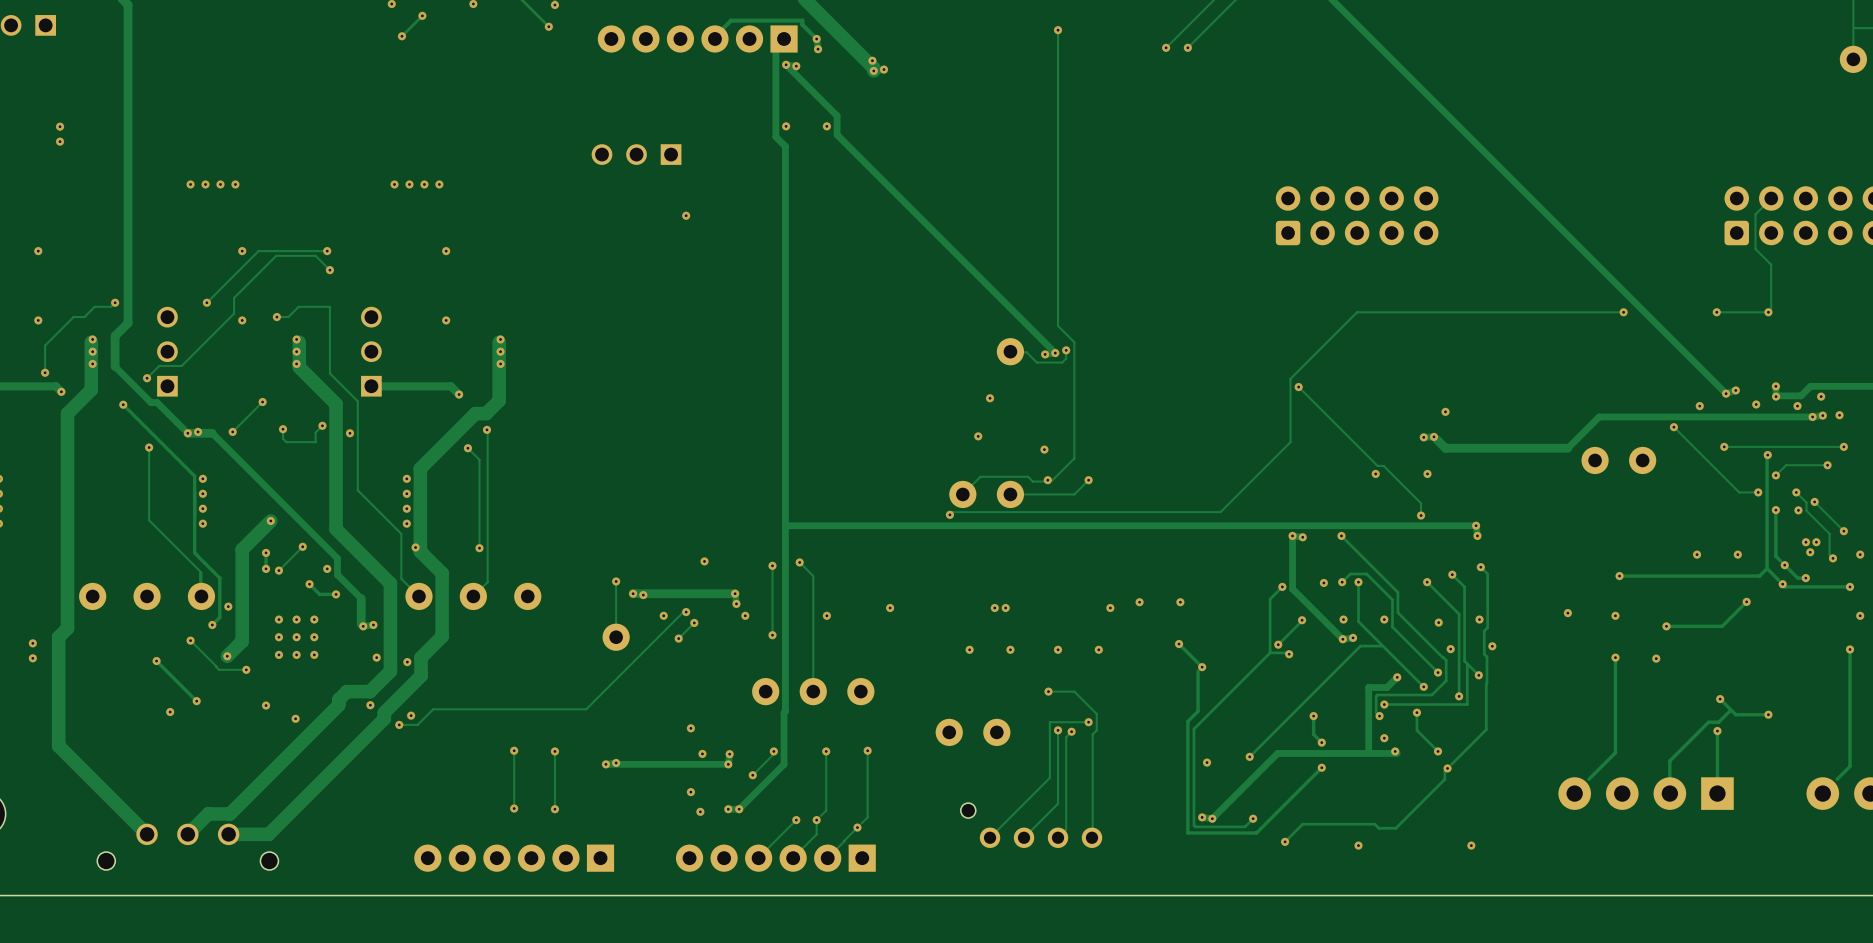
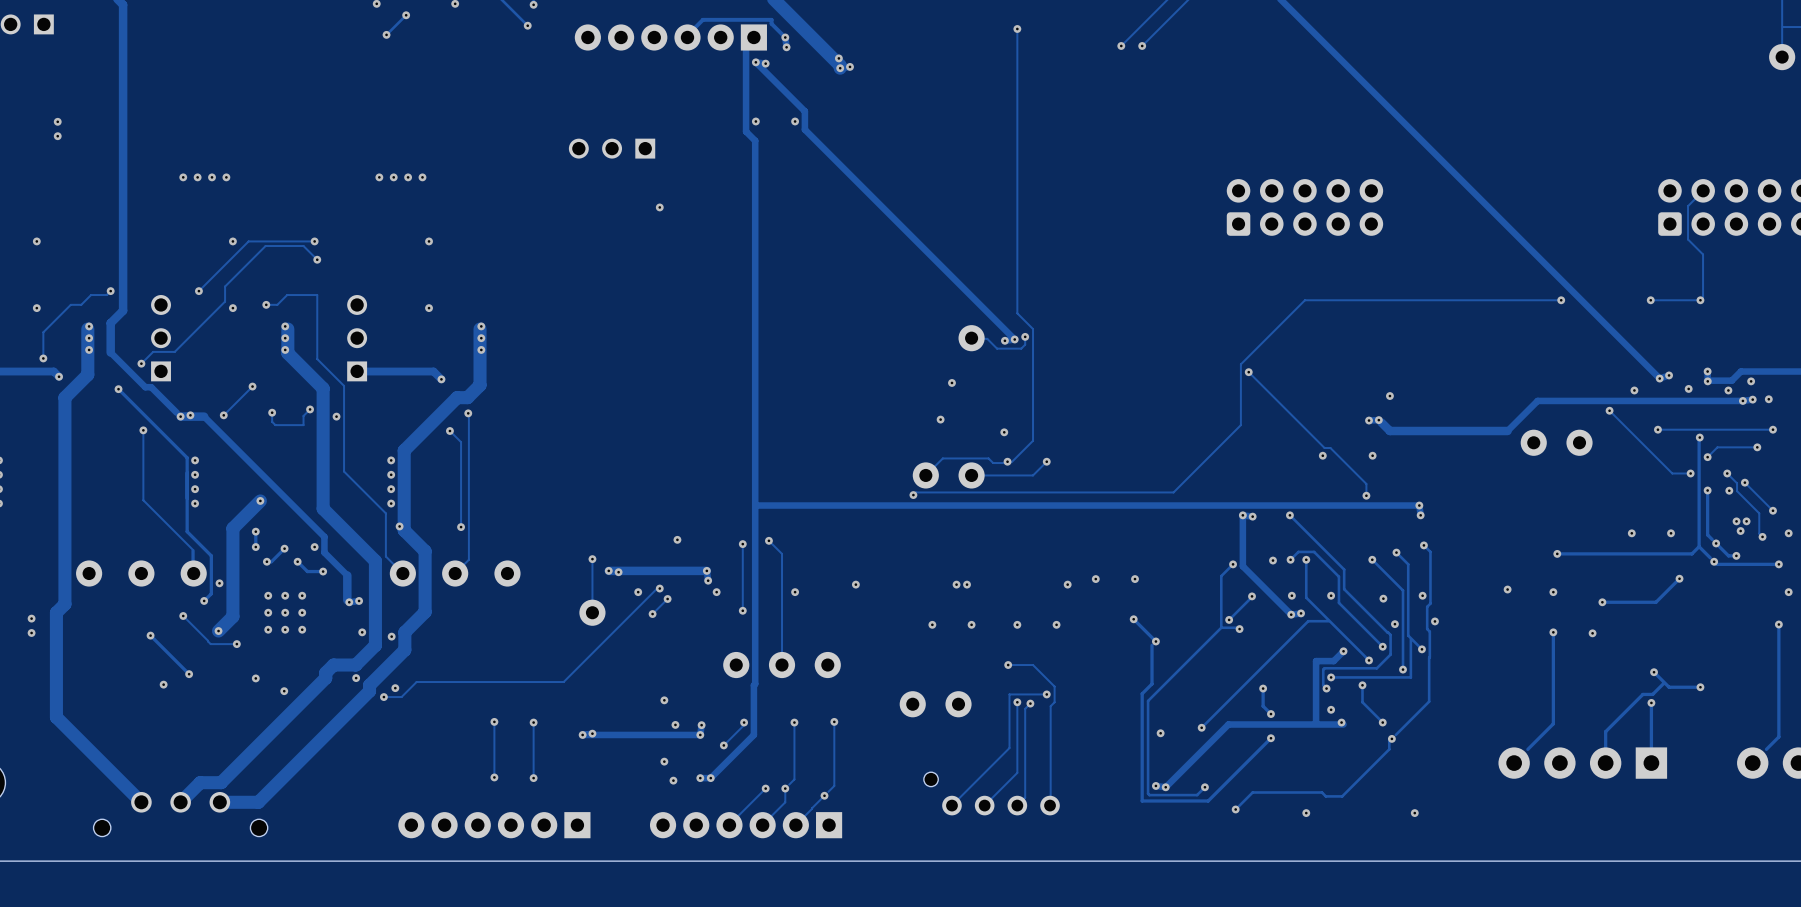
track: (302, 546) (278, 570) -> none
via: (302, 546) -> none
via: (278, 570) -> none
track: none -> (284, 548) (271, 561) (266, 561)
via: none -> (284, 548)
via: none -> (266, 561)

